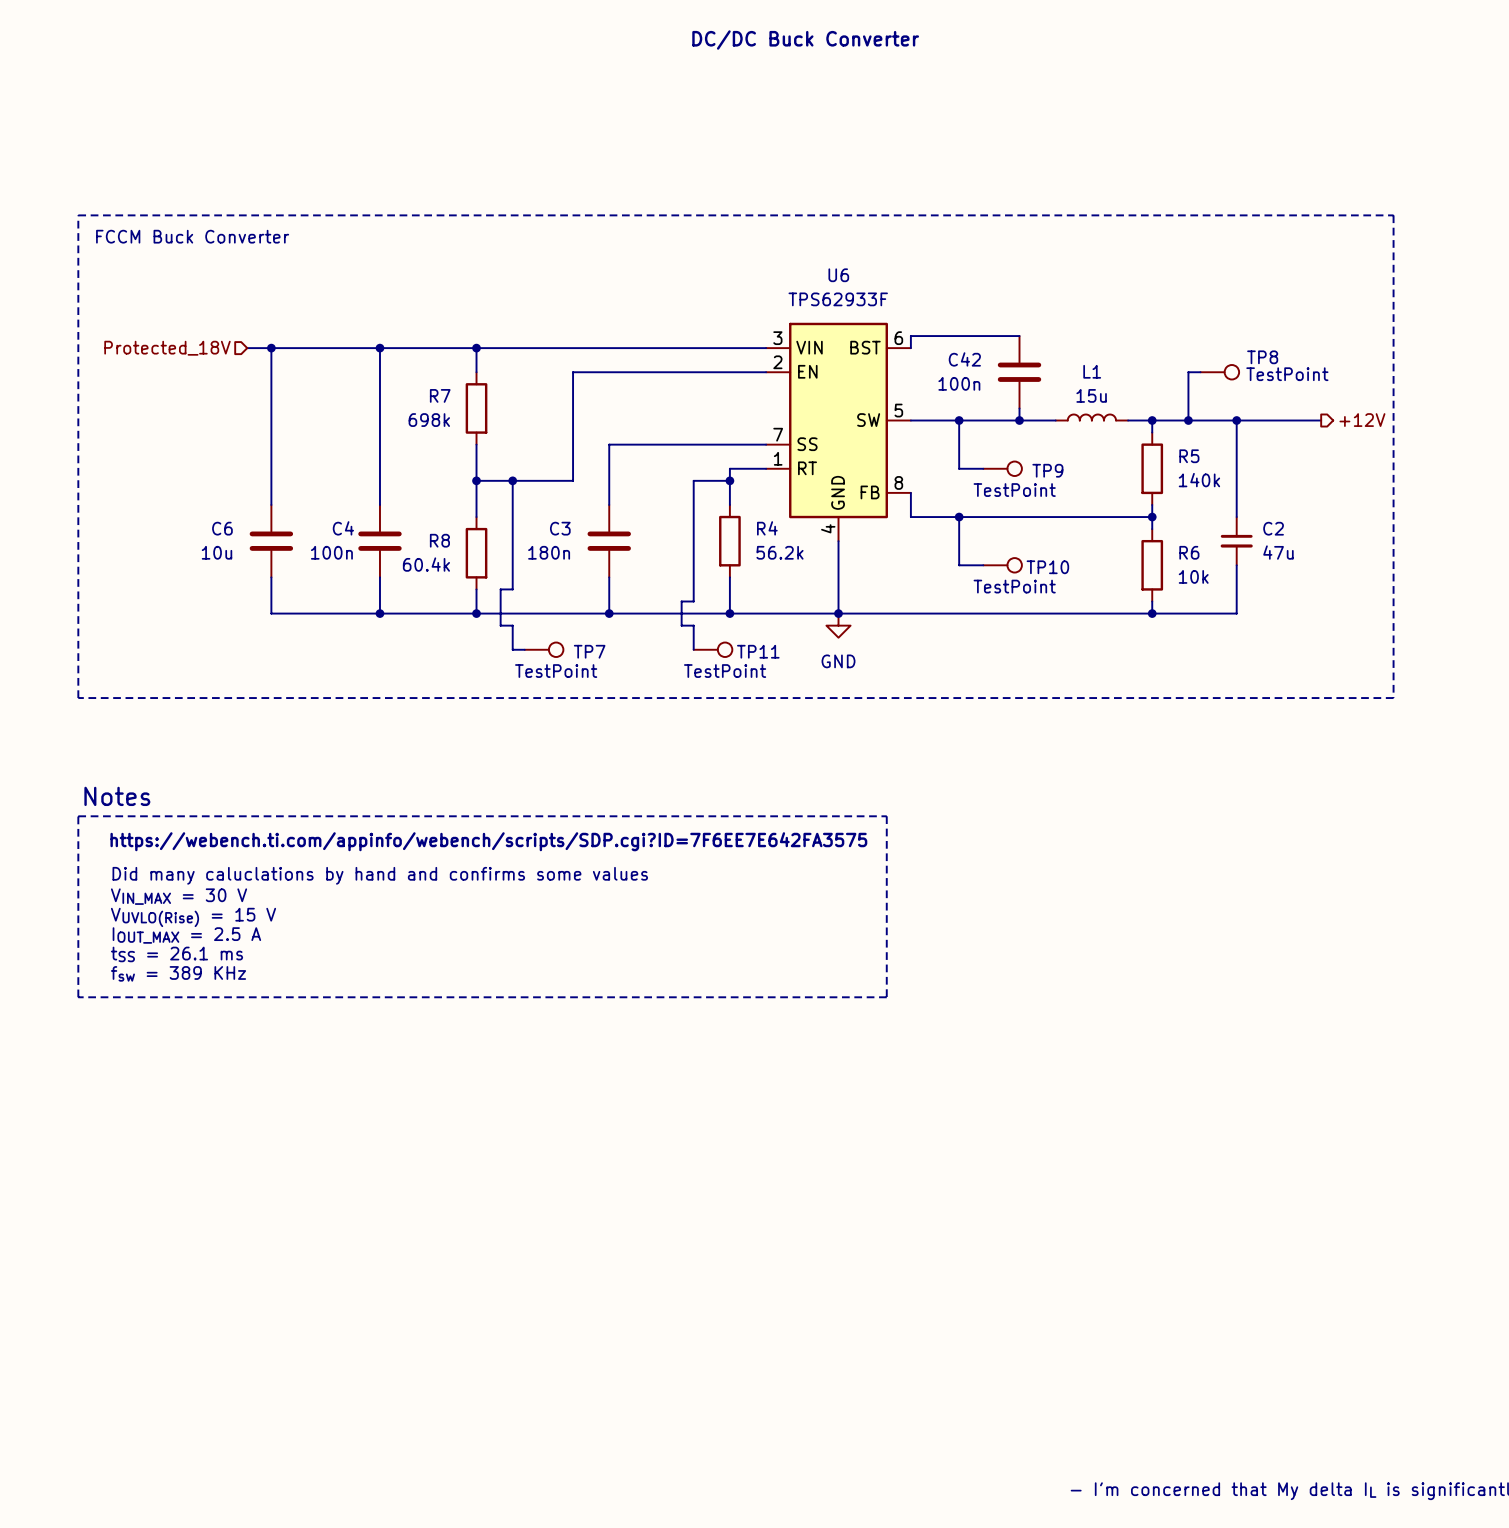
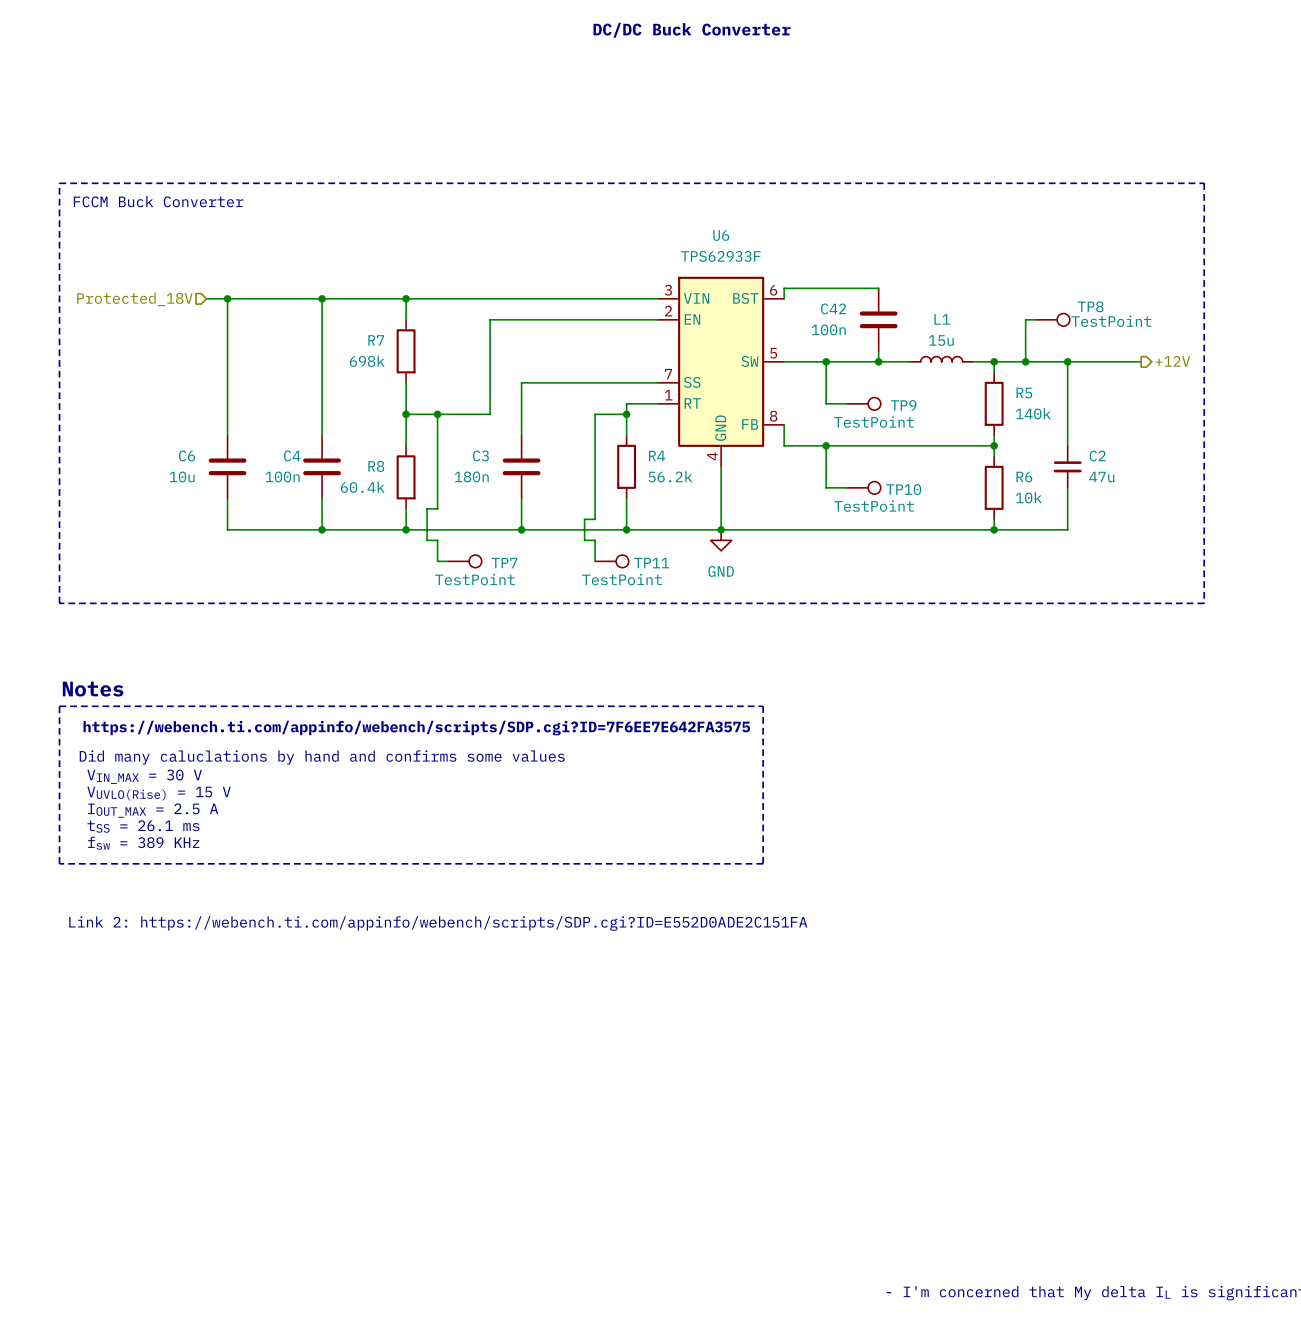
text: none -> Link 2: https://webench.ti.com/appinfo/webench/scripts/SDP.cgi?ID=E552D0ADE2C151FA (438, 923)

